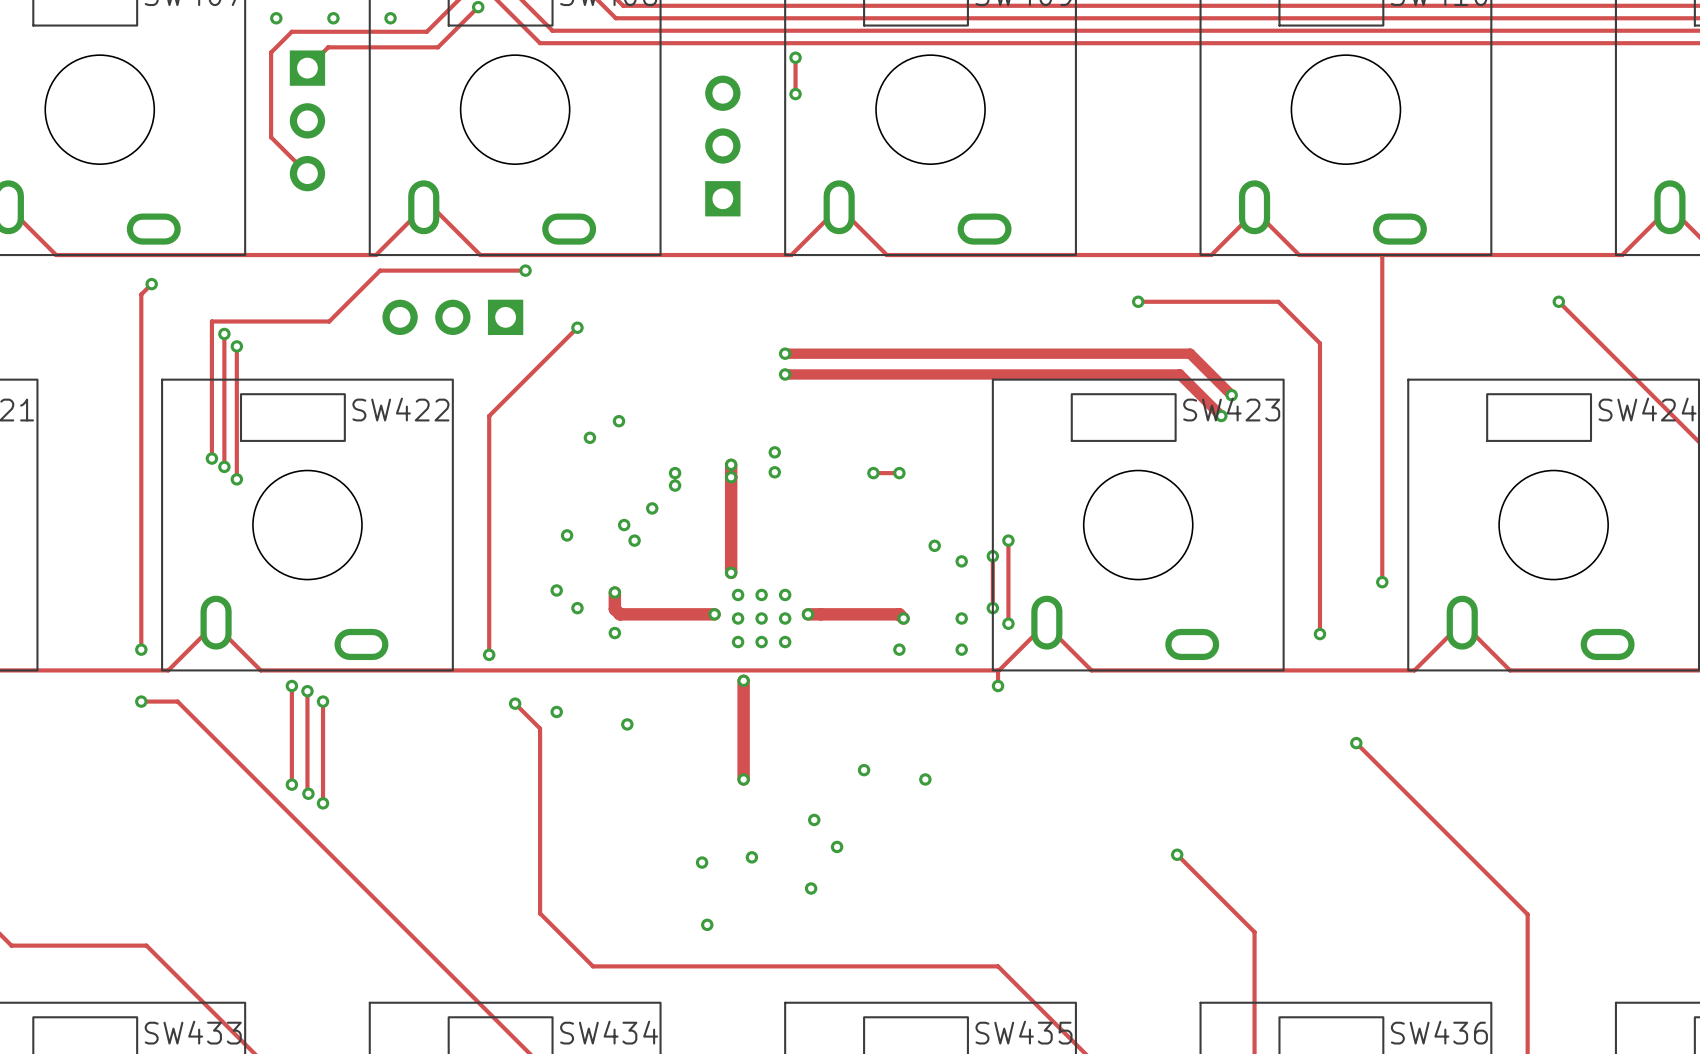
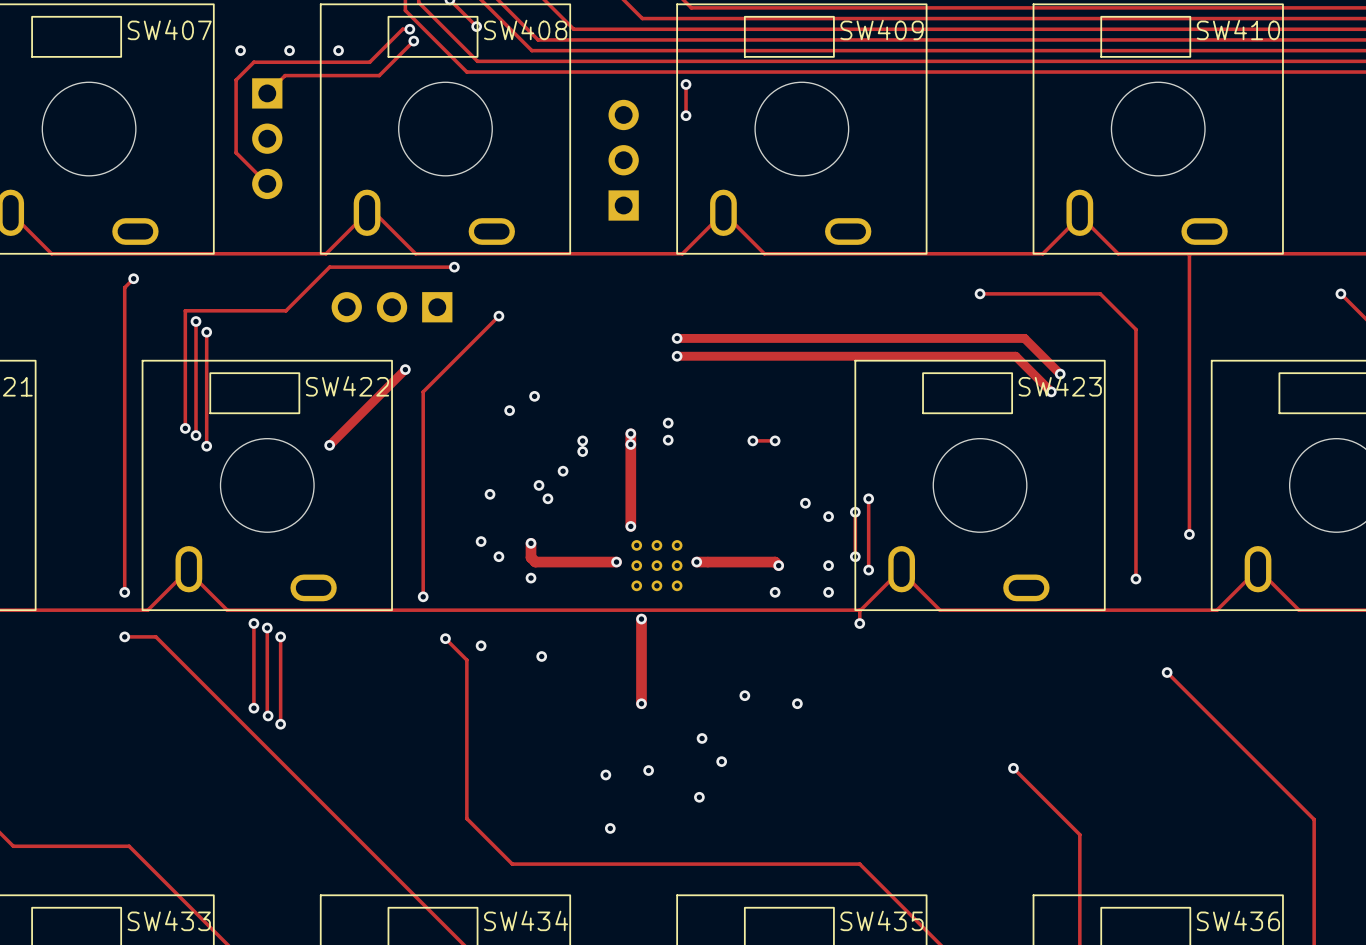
track: none -> (405, 369) (329, 445)
via: none -> (405, 369)
via: none -> (329, 445)

